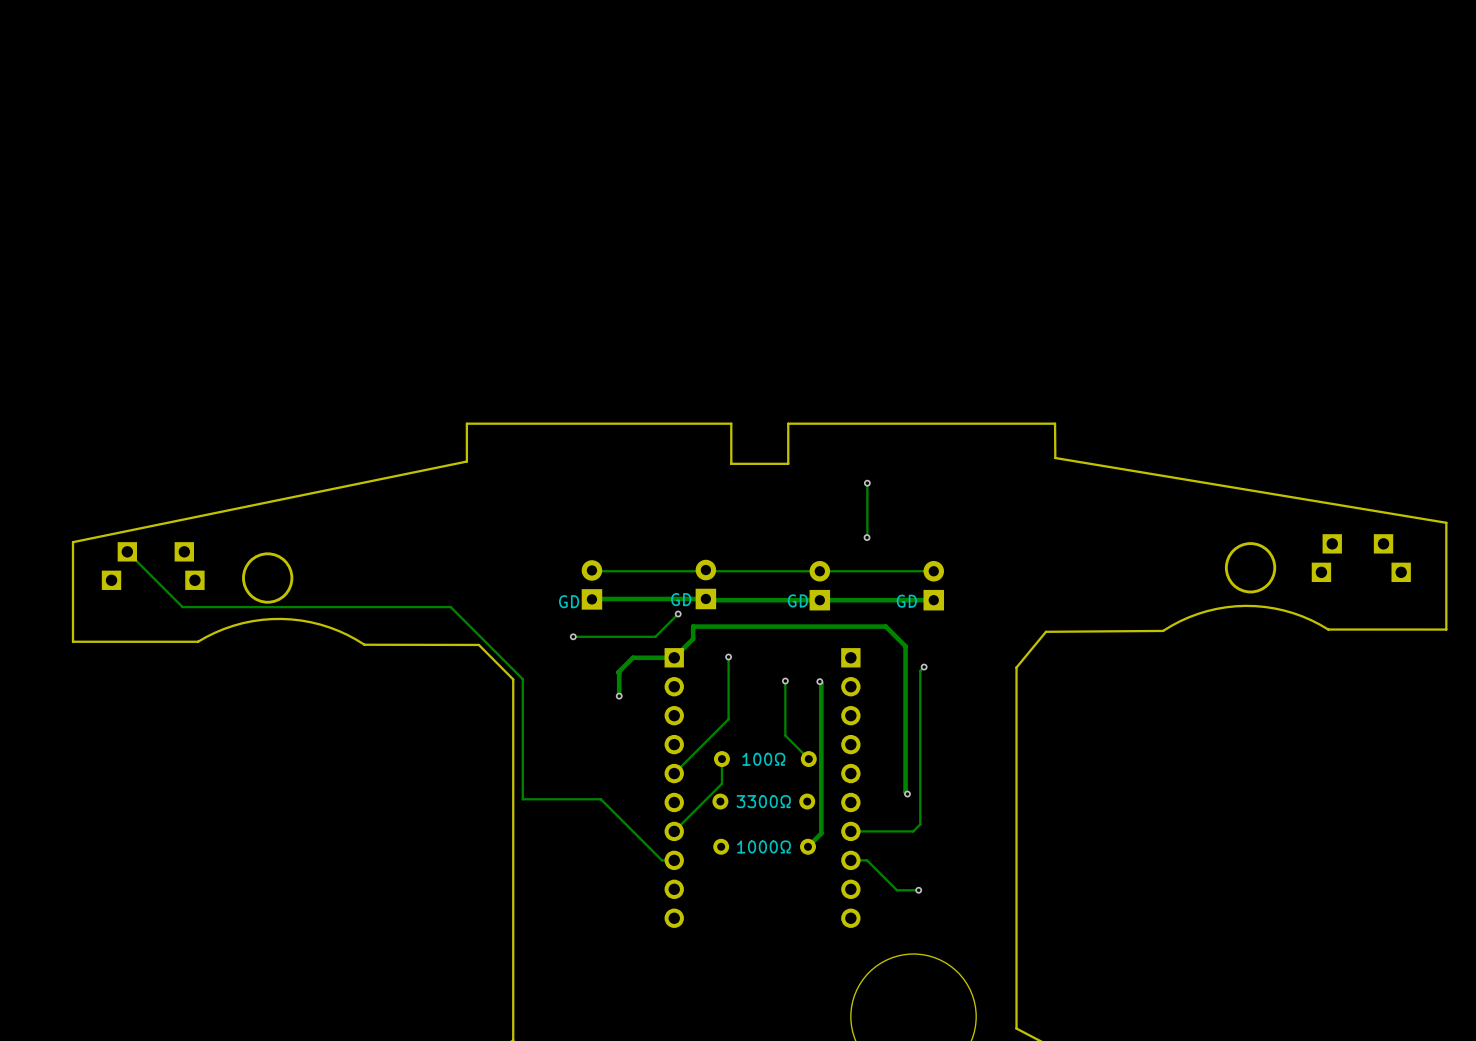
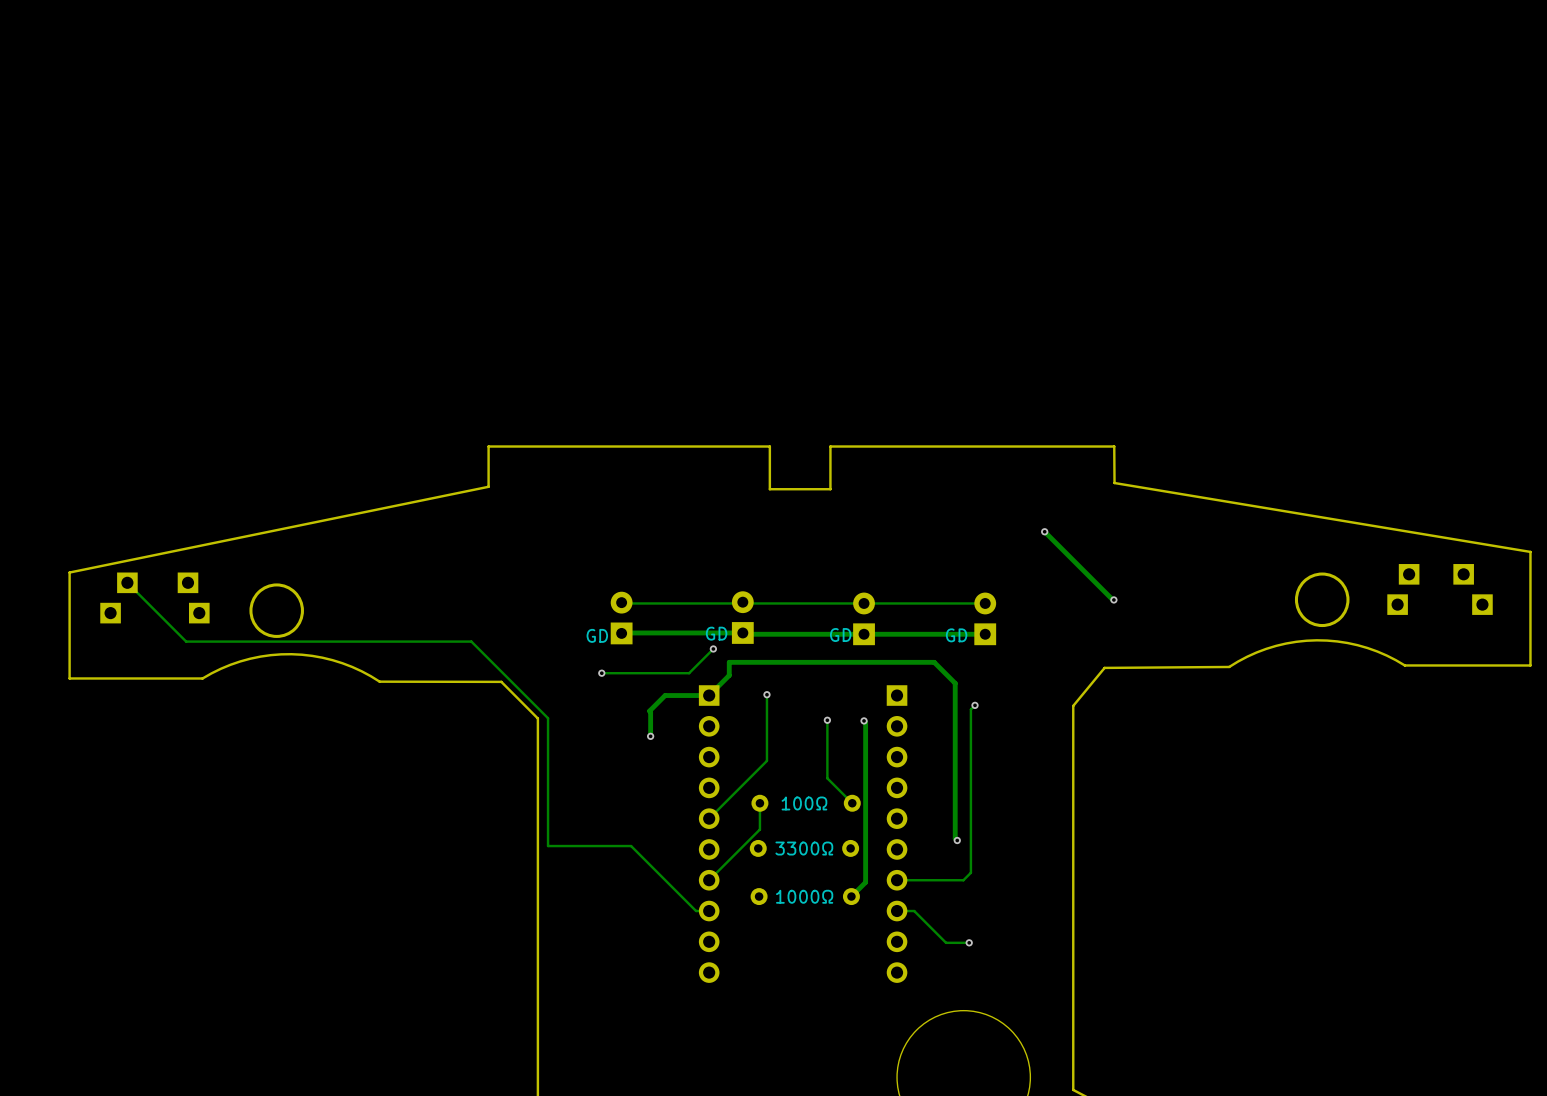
track: (867, 483) (867, 537) -> none
via: (867, 483) -> none
track: none -> (1044, 531) (1113, 599)
via: none -> (1044, 531)
via: (867, 537) -> none
via: none -> (1113, 599)

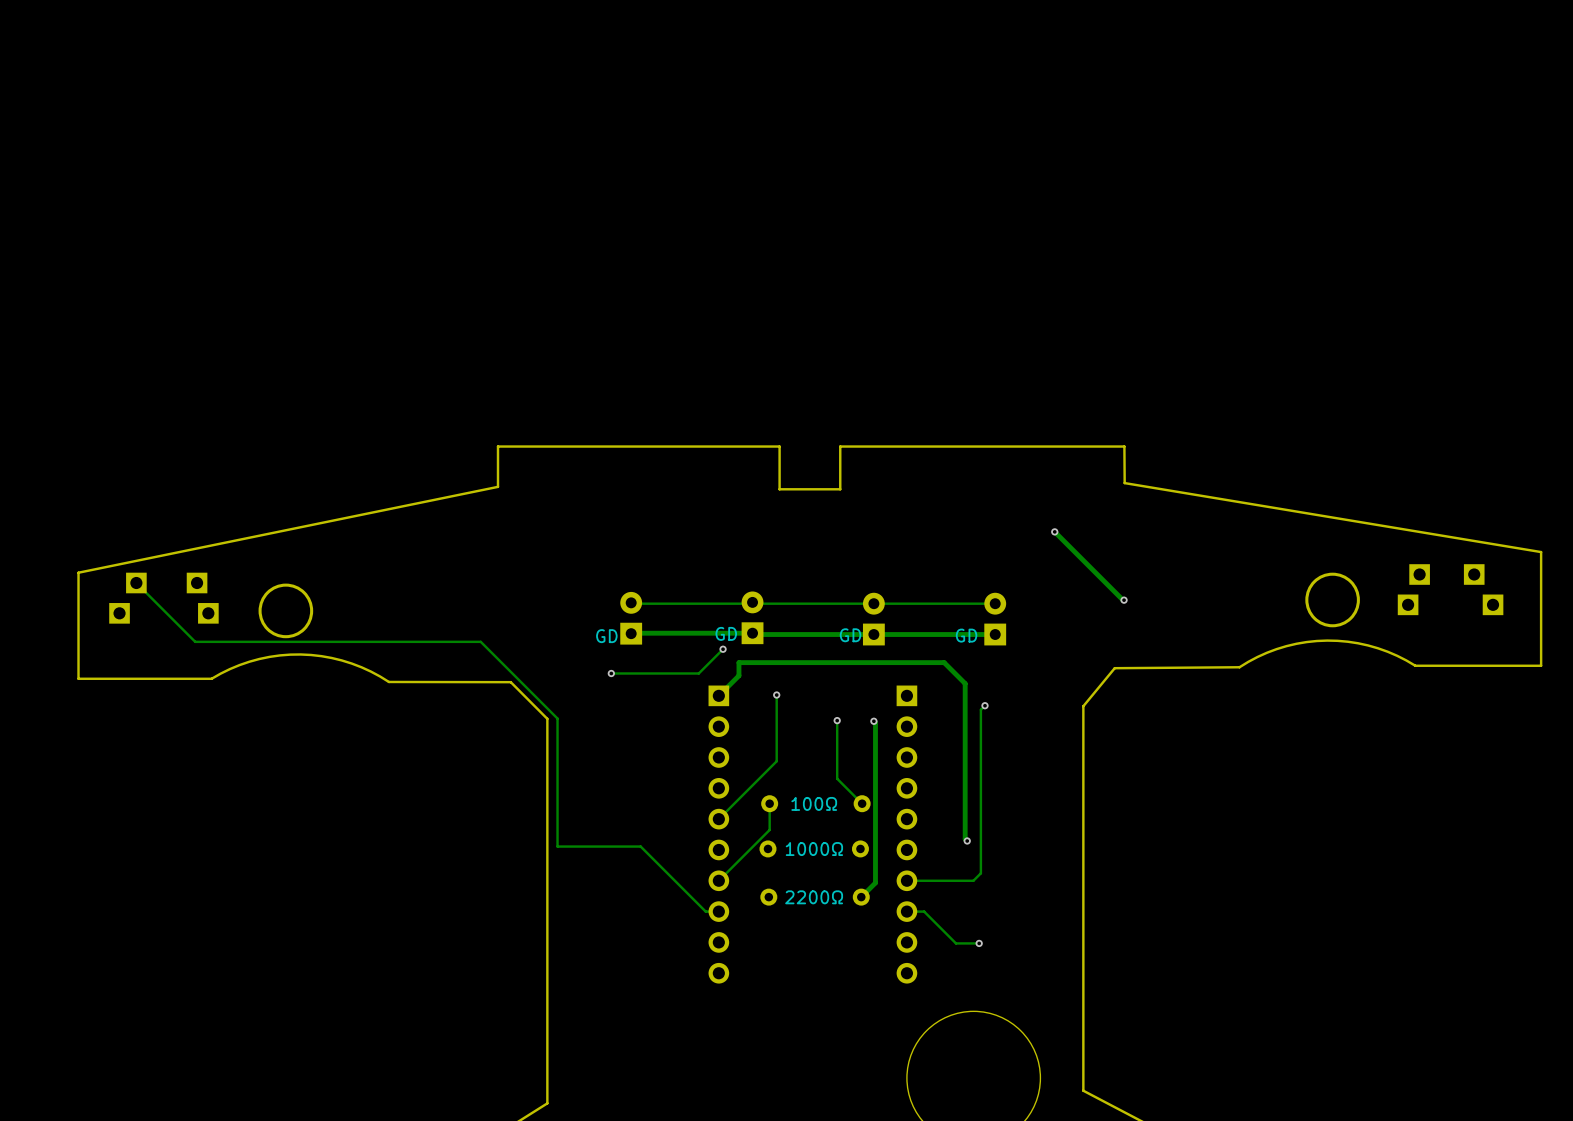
track: (709, 695) (665, 695) (649, 711) (650, 736) -> none
via: (650, 736) -> none
text: 3300Ω (804, 848) -> 1000Ω (814, 849)
text: 1000Ω (804, 896) -> 2200Ω (814, 897)

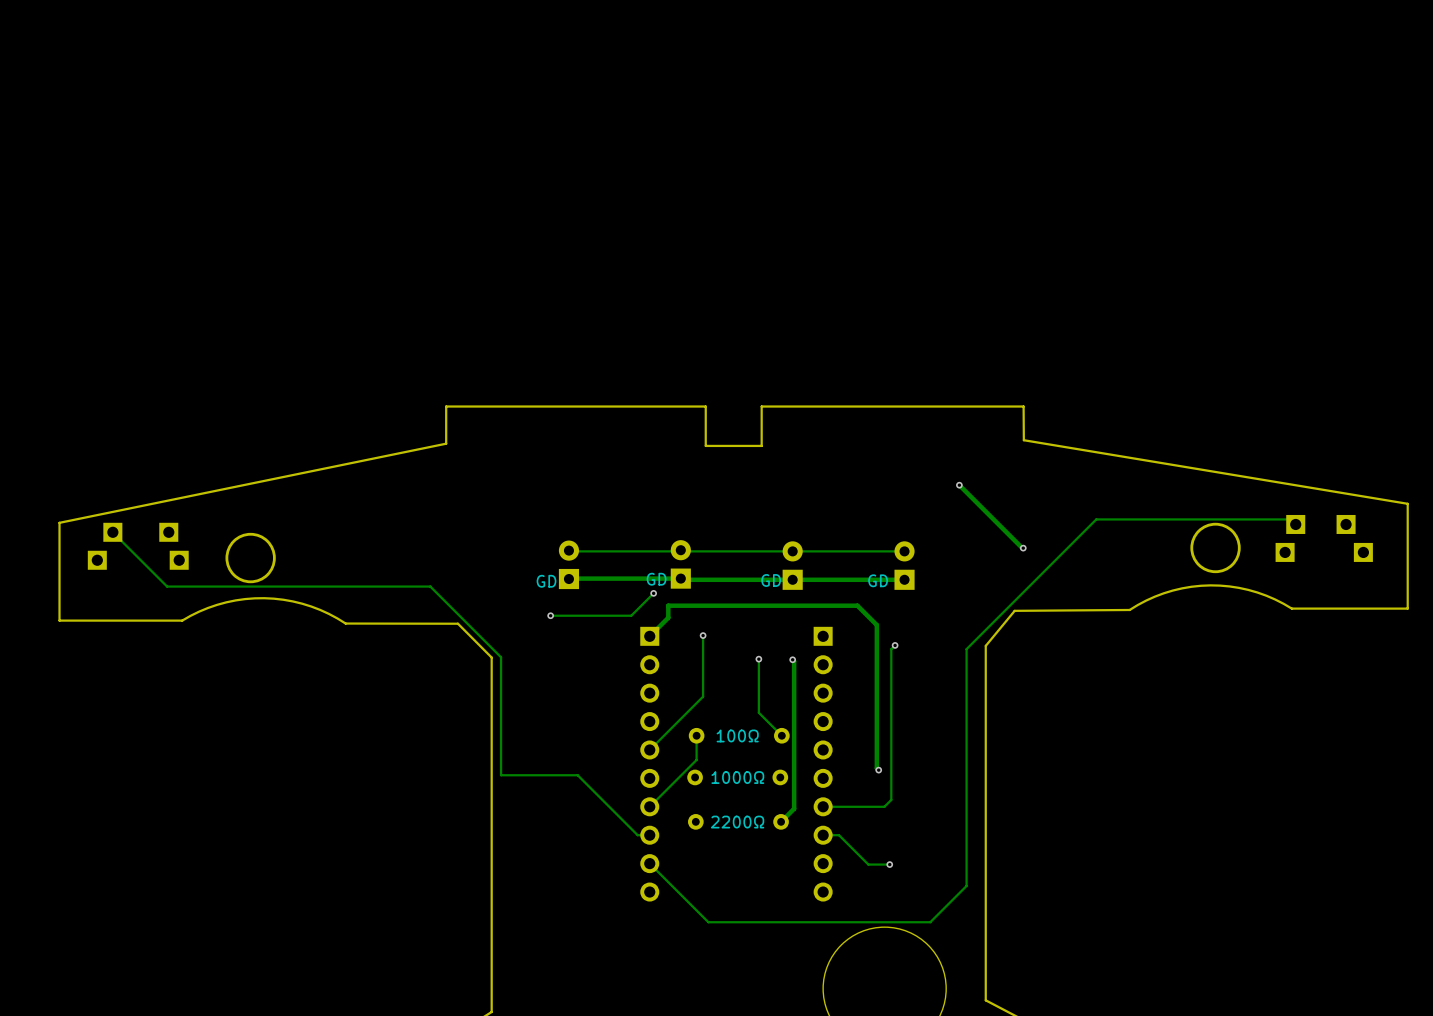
track: none -> (1295, 524) (1290, 519) (1096, 519) (966, 649) (966, 885) (930, 922) (708, 922) (649, 863)

